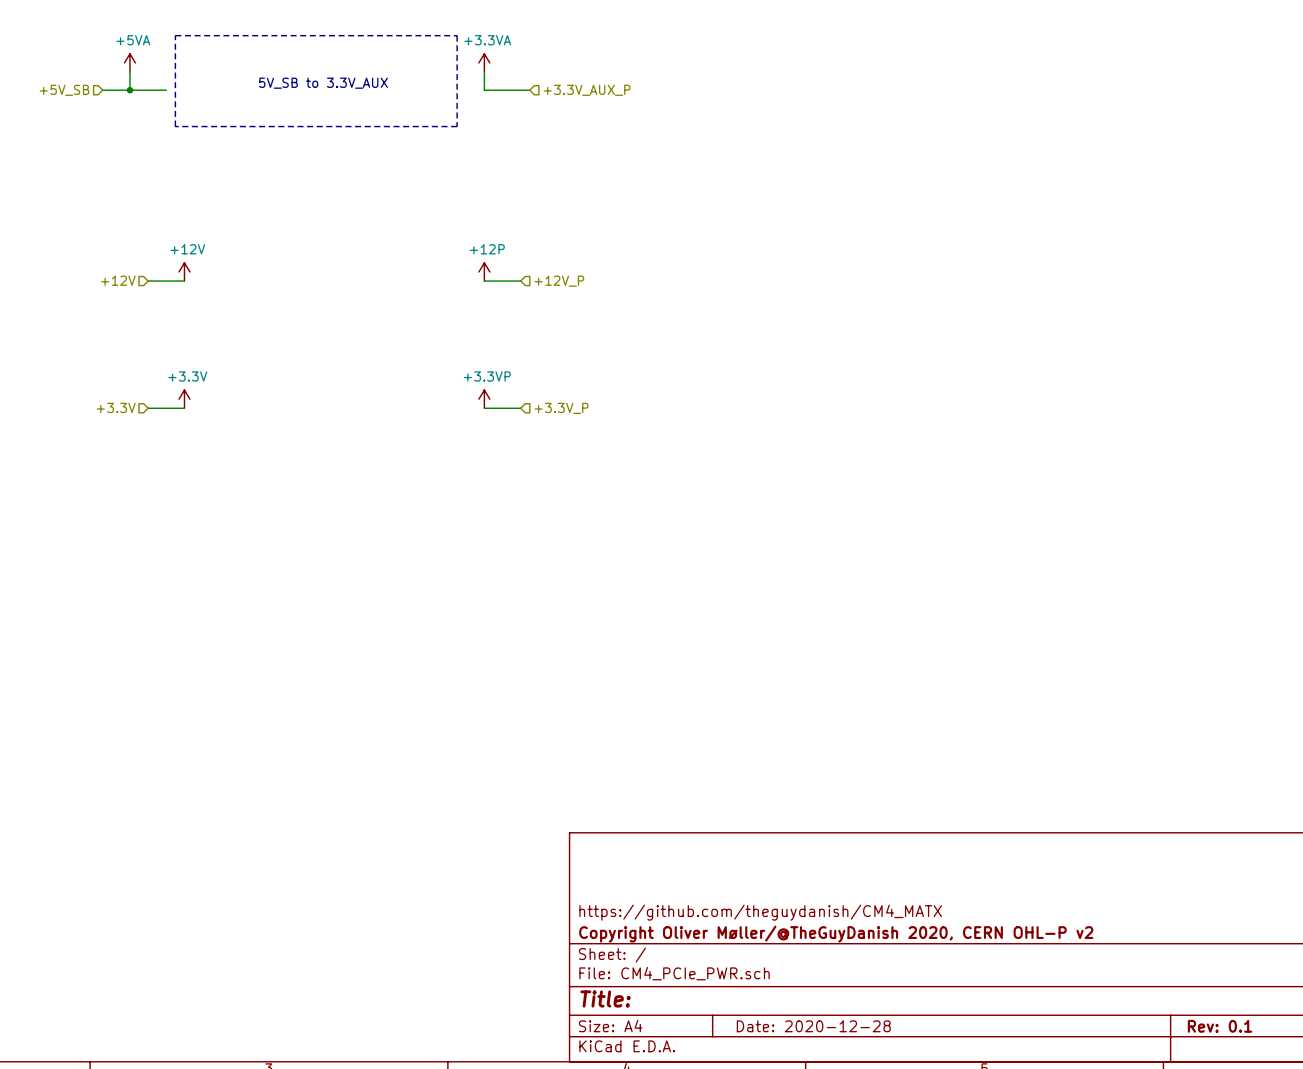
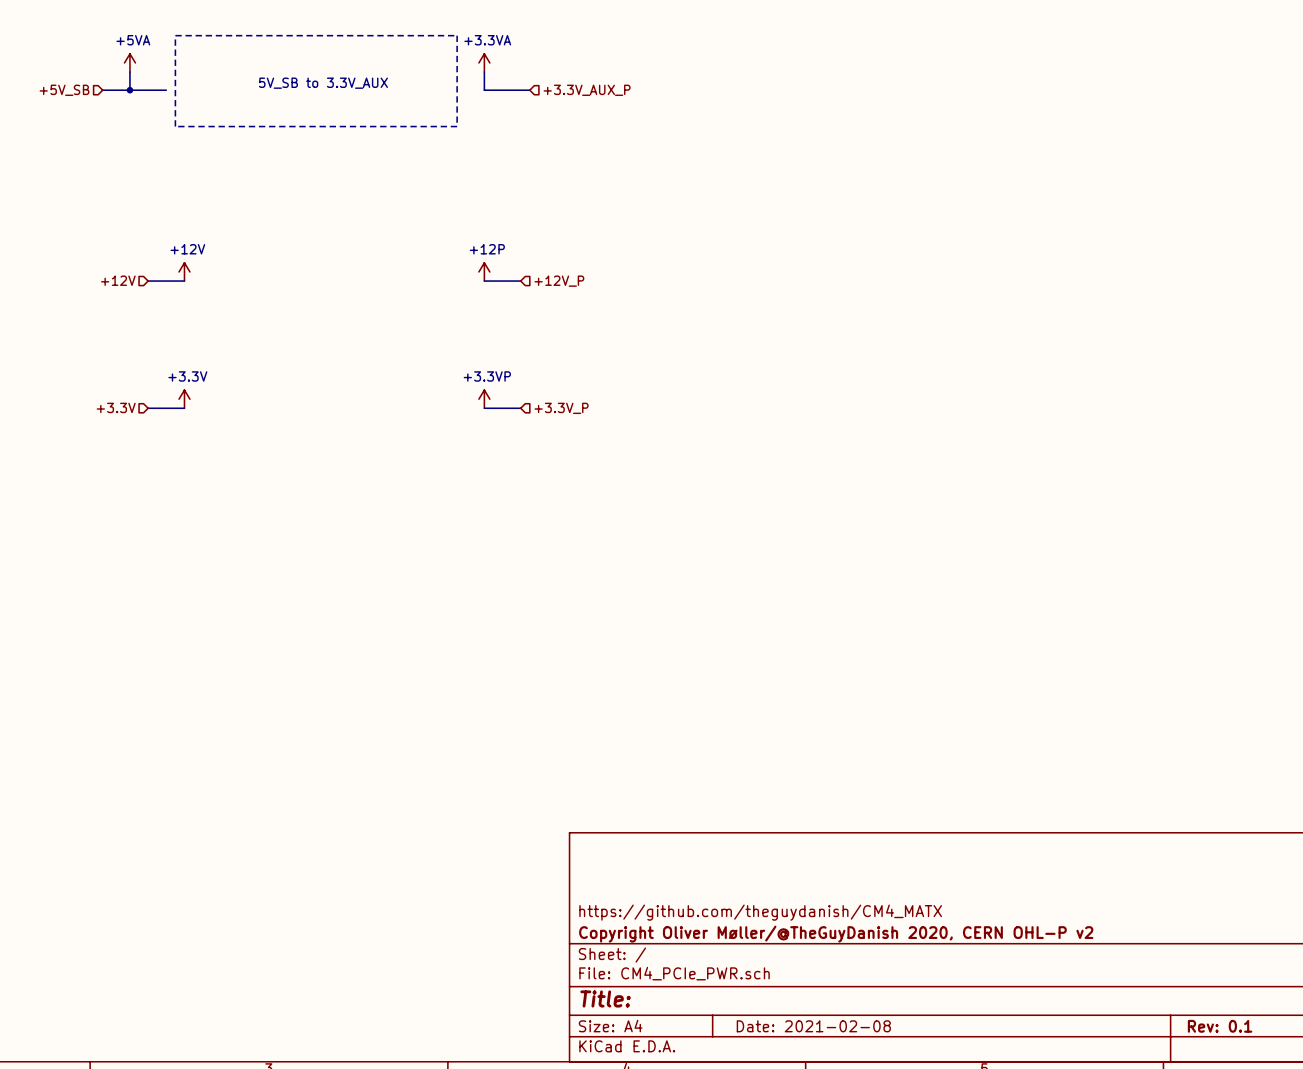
title block: Date: 2020-12-28 (813, 1026) -> Date: 2021-02-08 (813, 1026)

